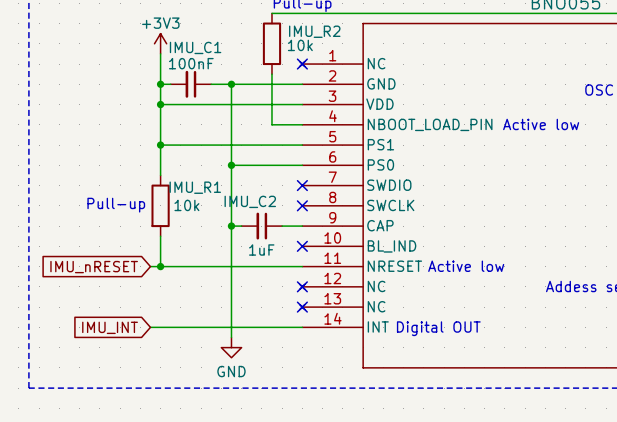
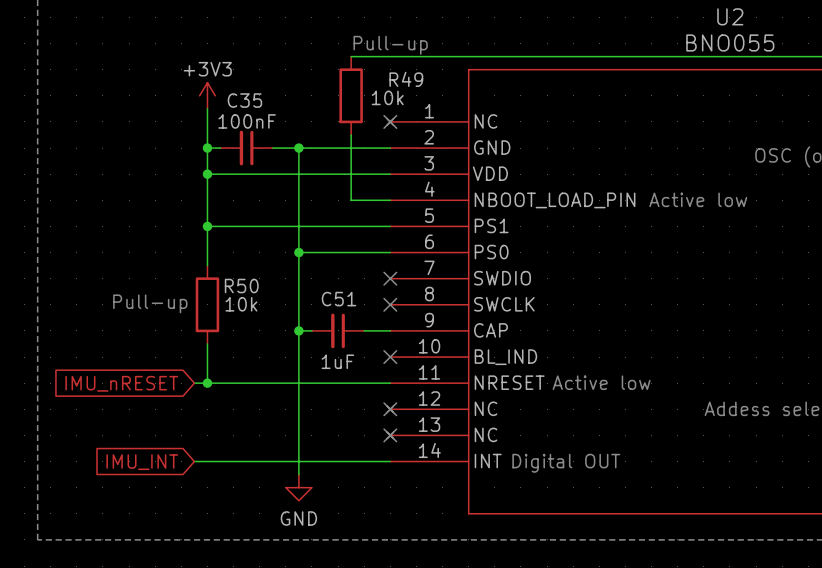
IMU_R2 name: IMU_R2 (314, 31) -> R49 (406, 79)
IMU_C1 name: IMU_C1 (195, 47) -> C35 (244, 100)
IMU_R1 name: IMU_R1 (195, 187) -> R50 (241, 286)
IMU_C2 name: IMU_C2 (250, 201) -> C51 (338, 299)

